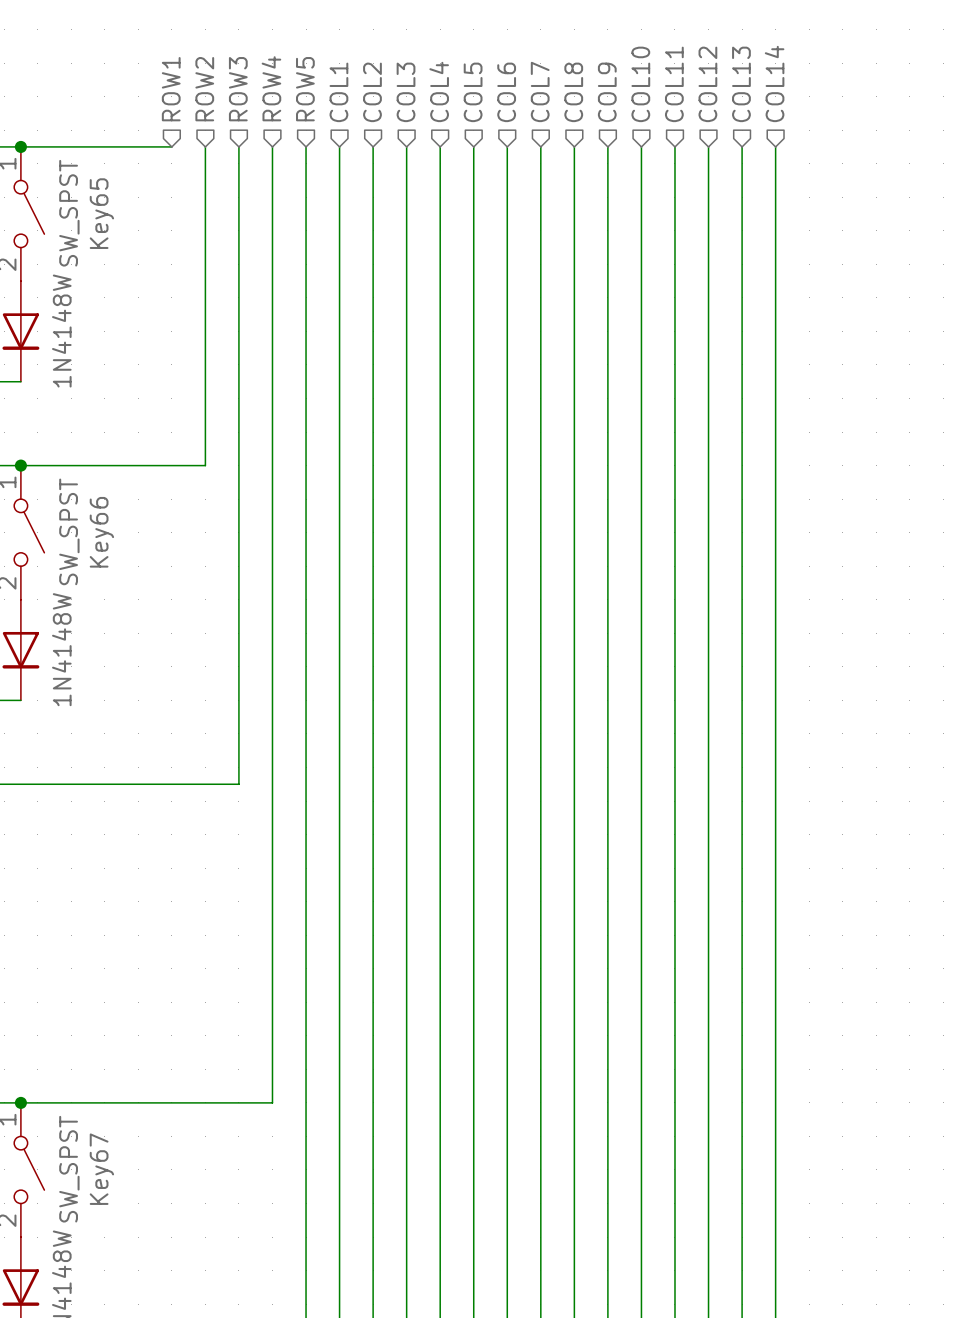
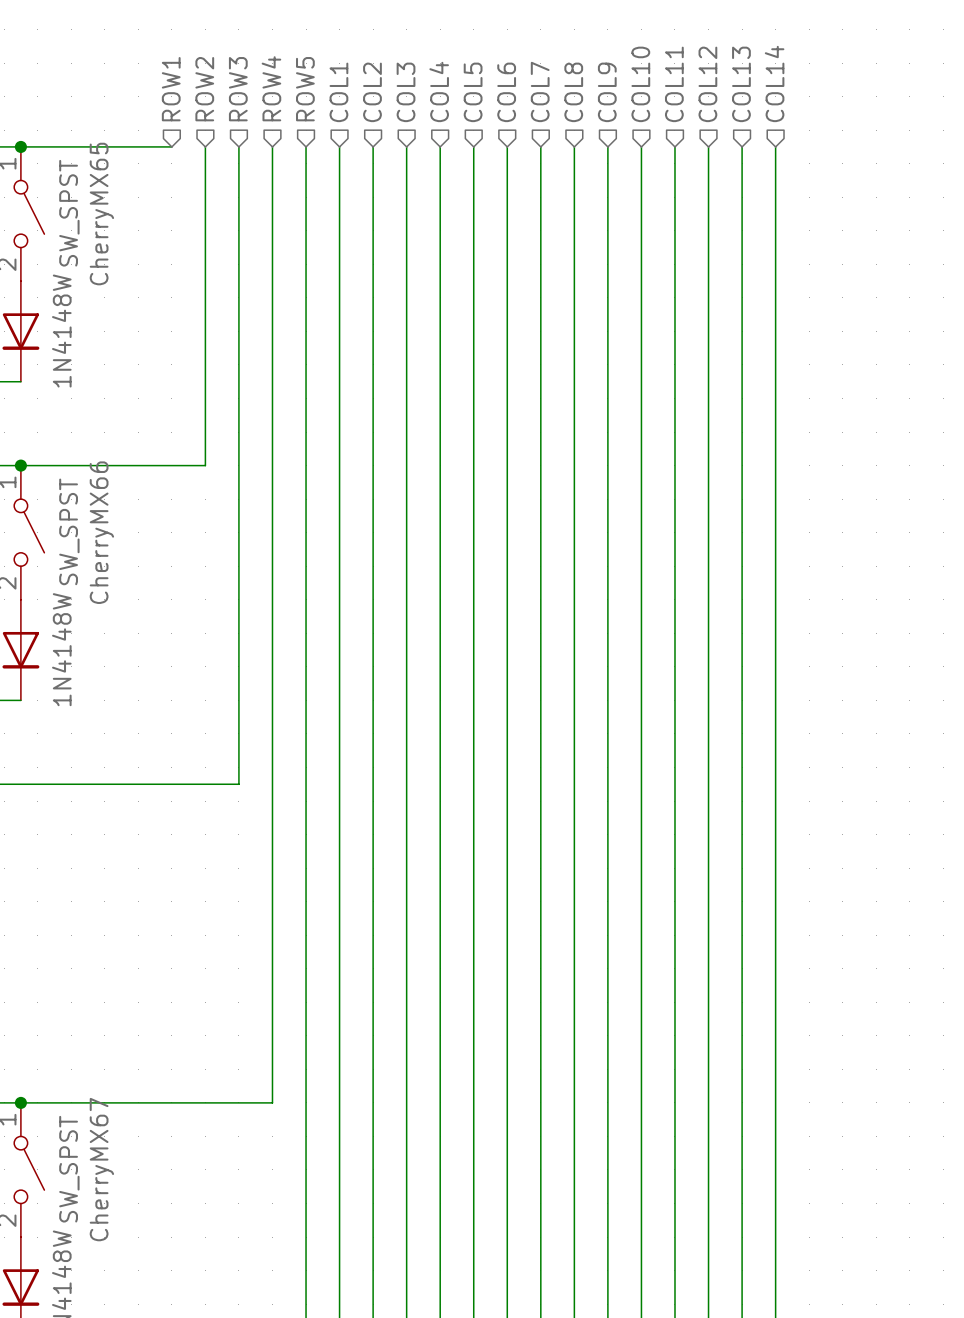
Key65 name: Key65 (101, 213) -> CherryMX65 (101, 214)
Key66 name: Key66 (101, 532) -> CherryMX66 (101, 532)
Key67 name: Key67 (101, 1169) -> CherryMX67 (101, 1169)

